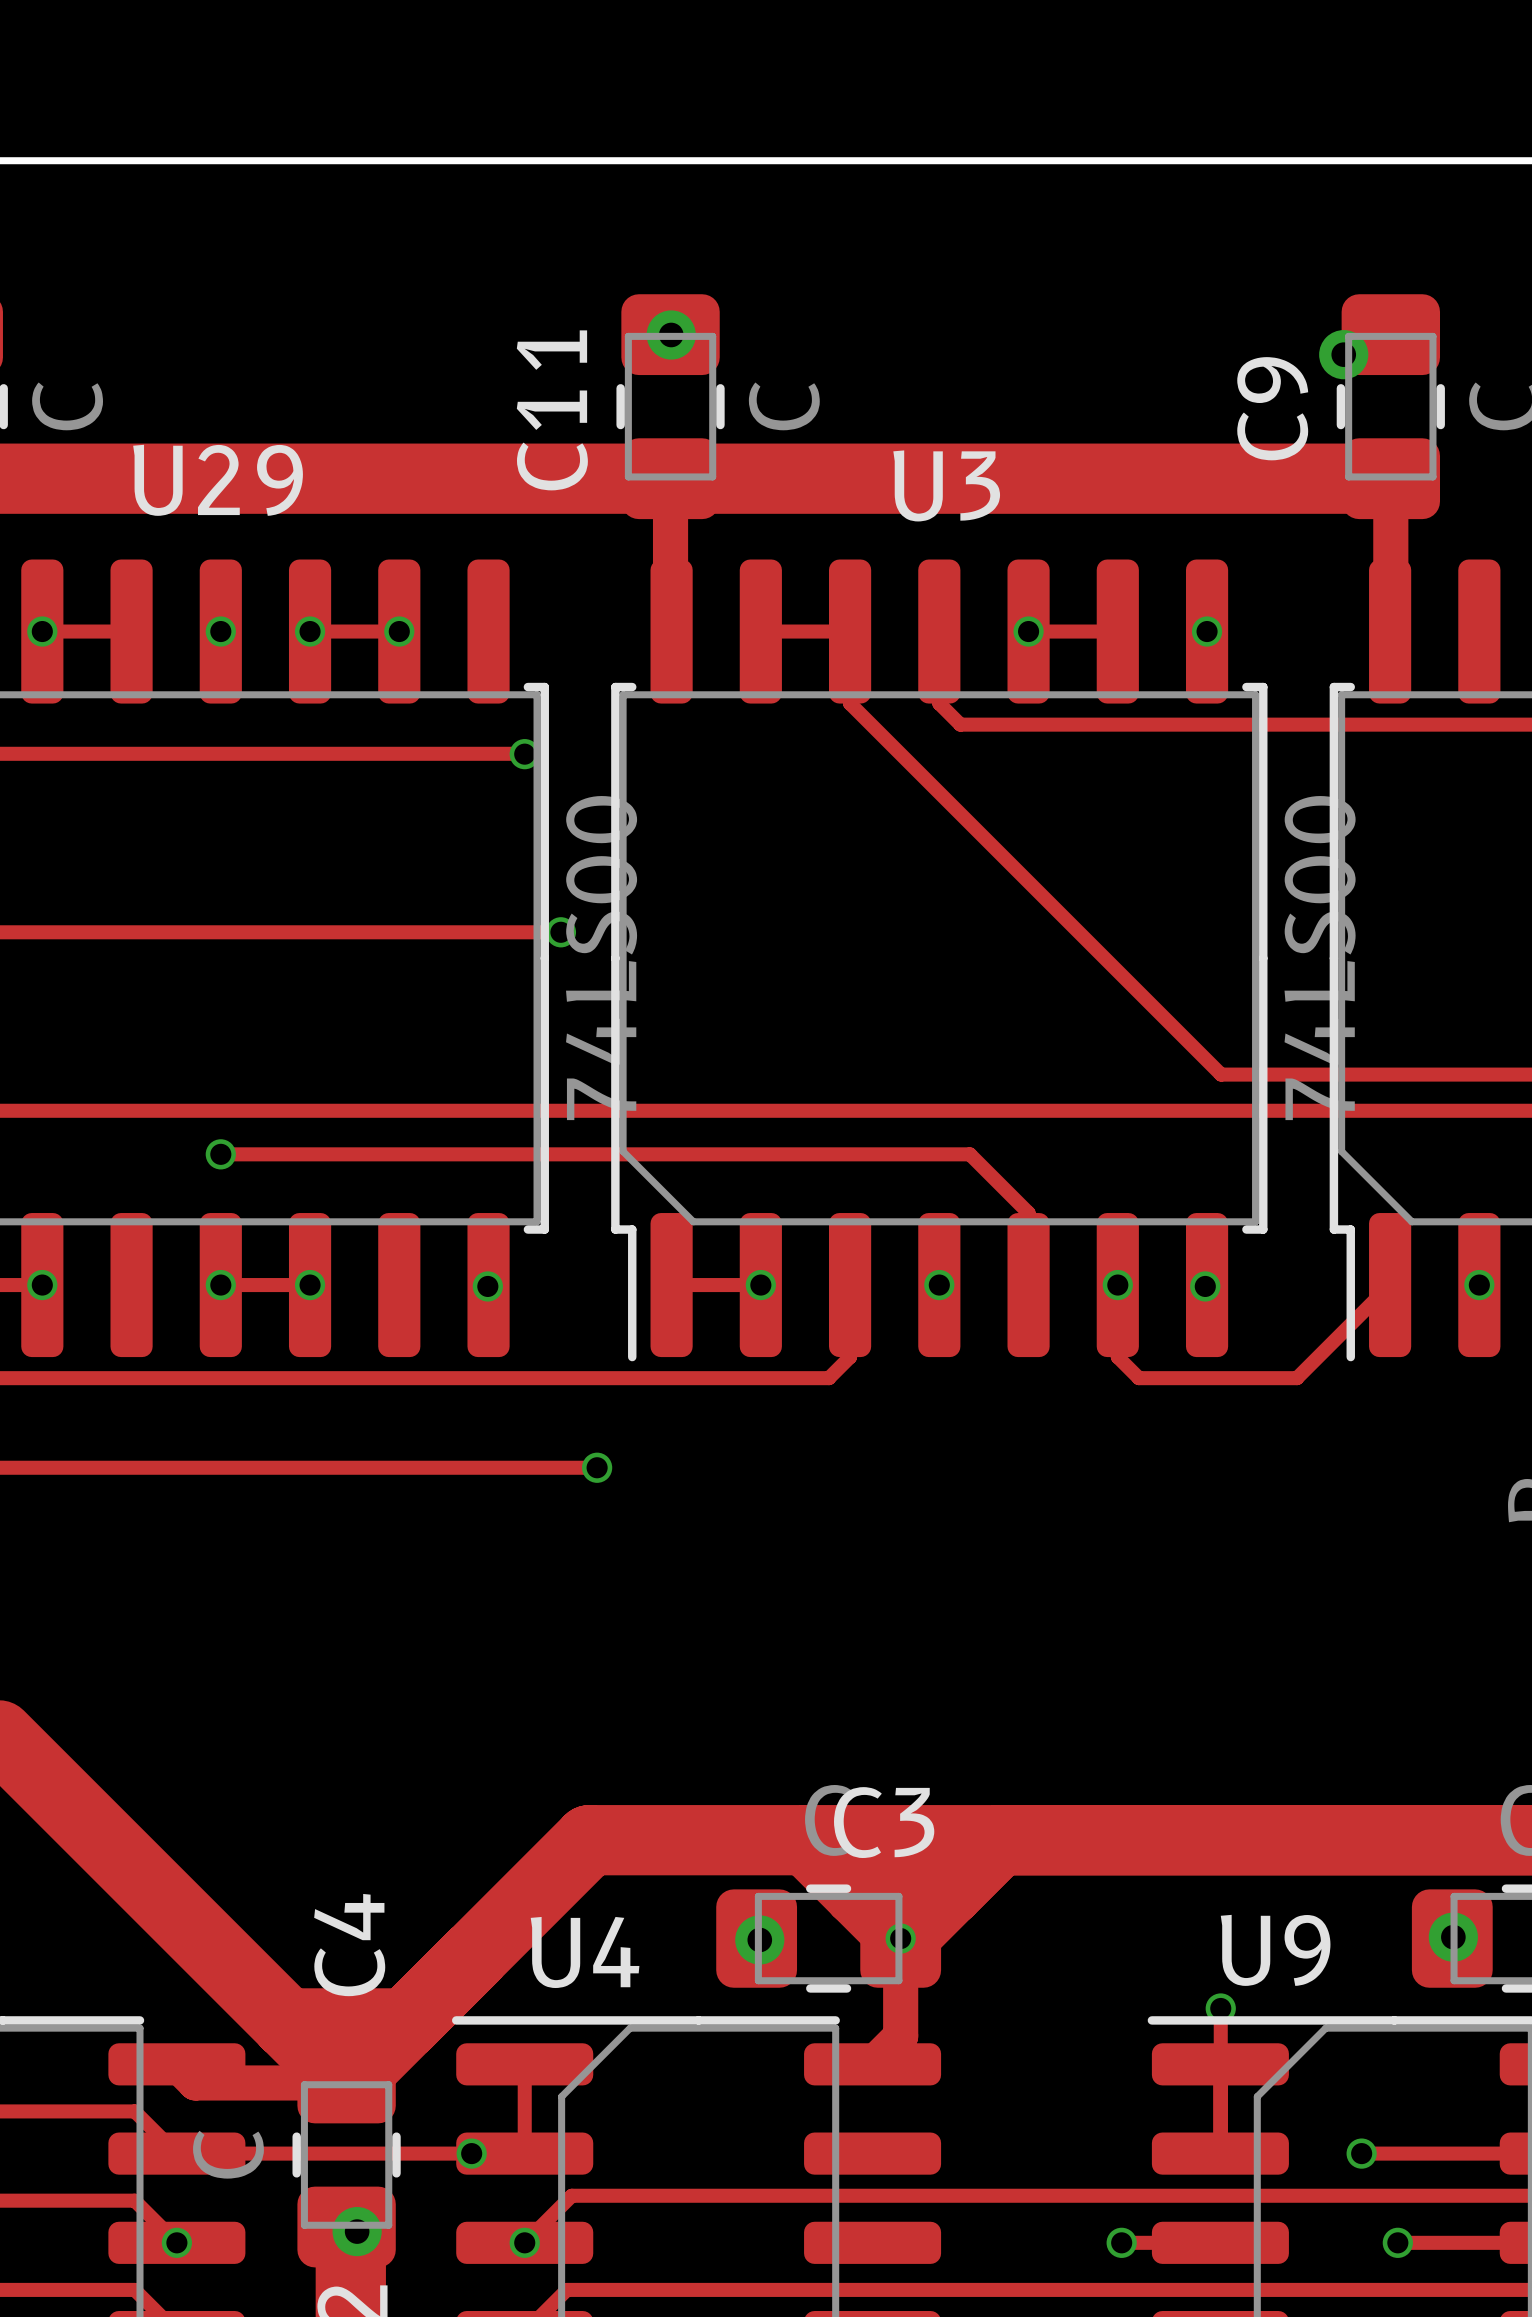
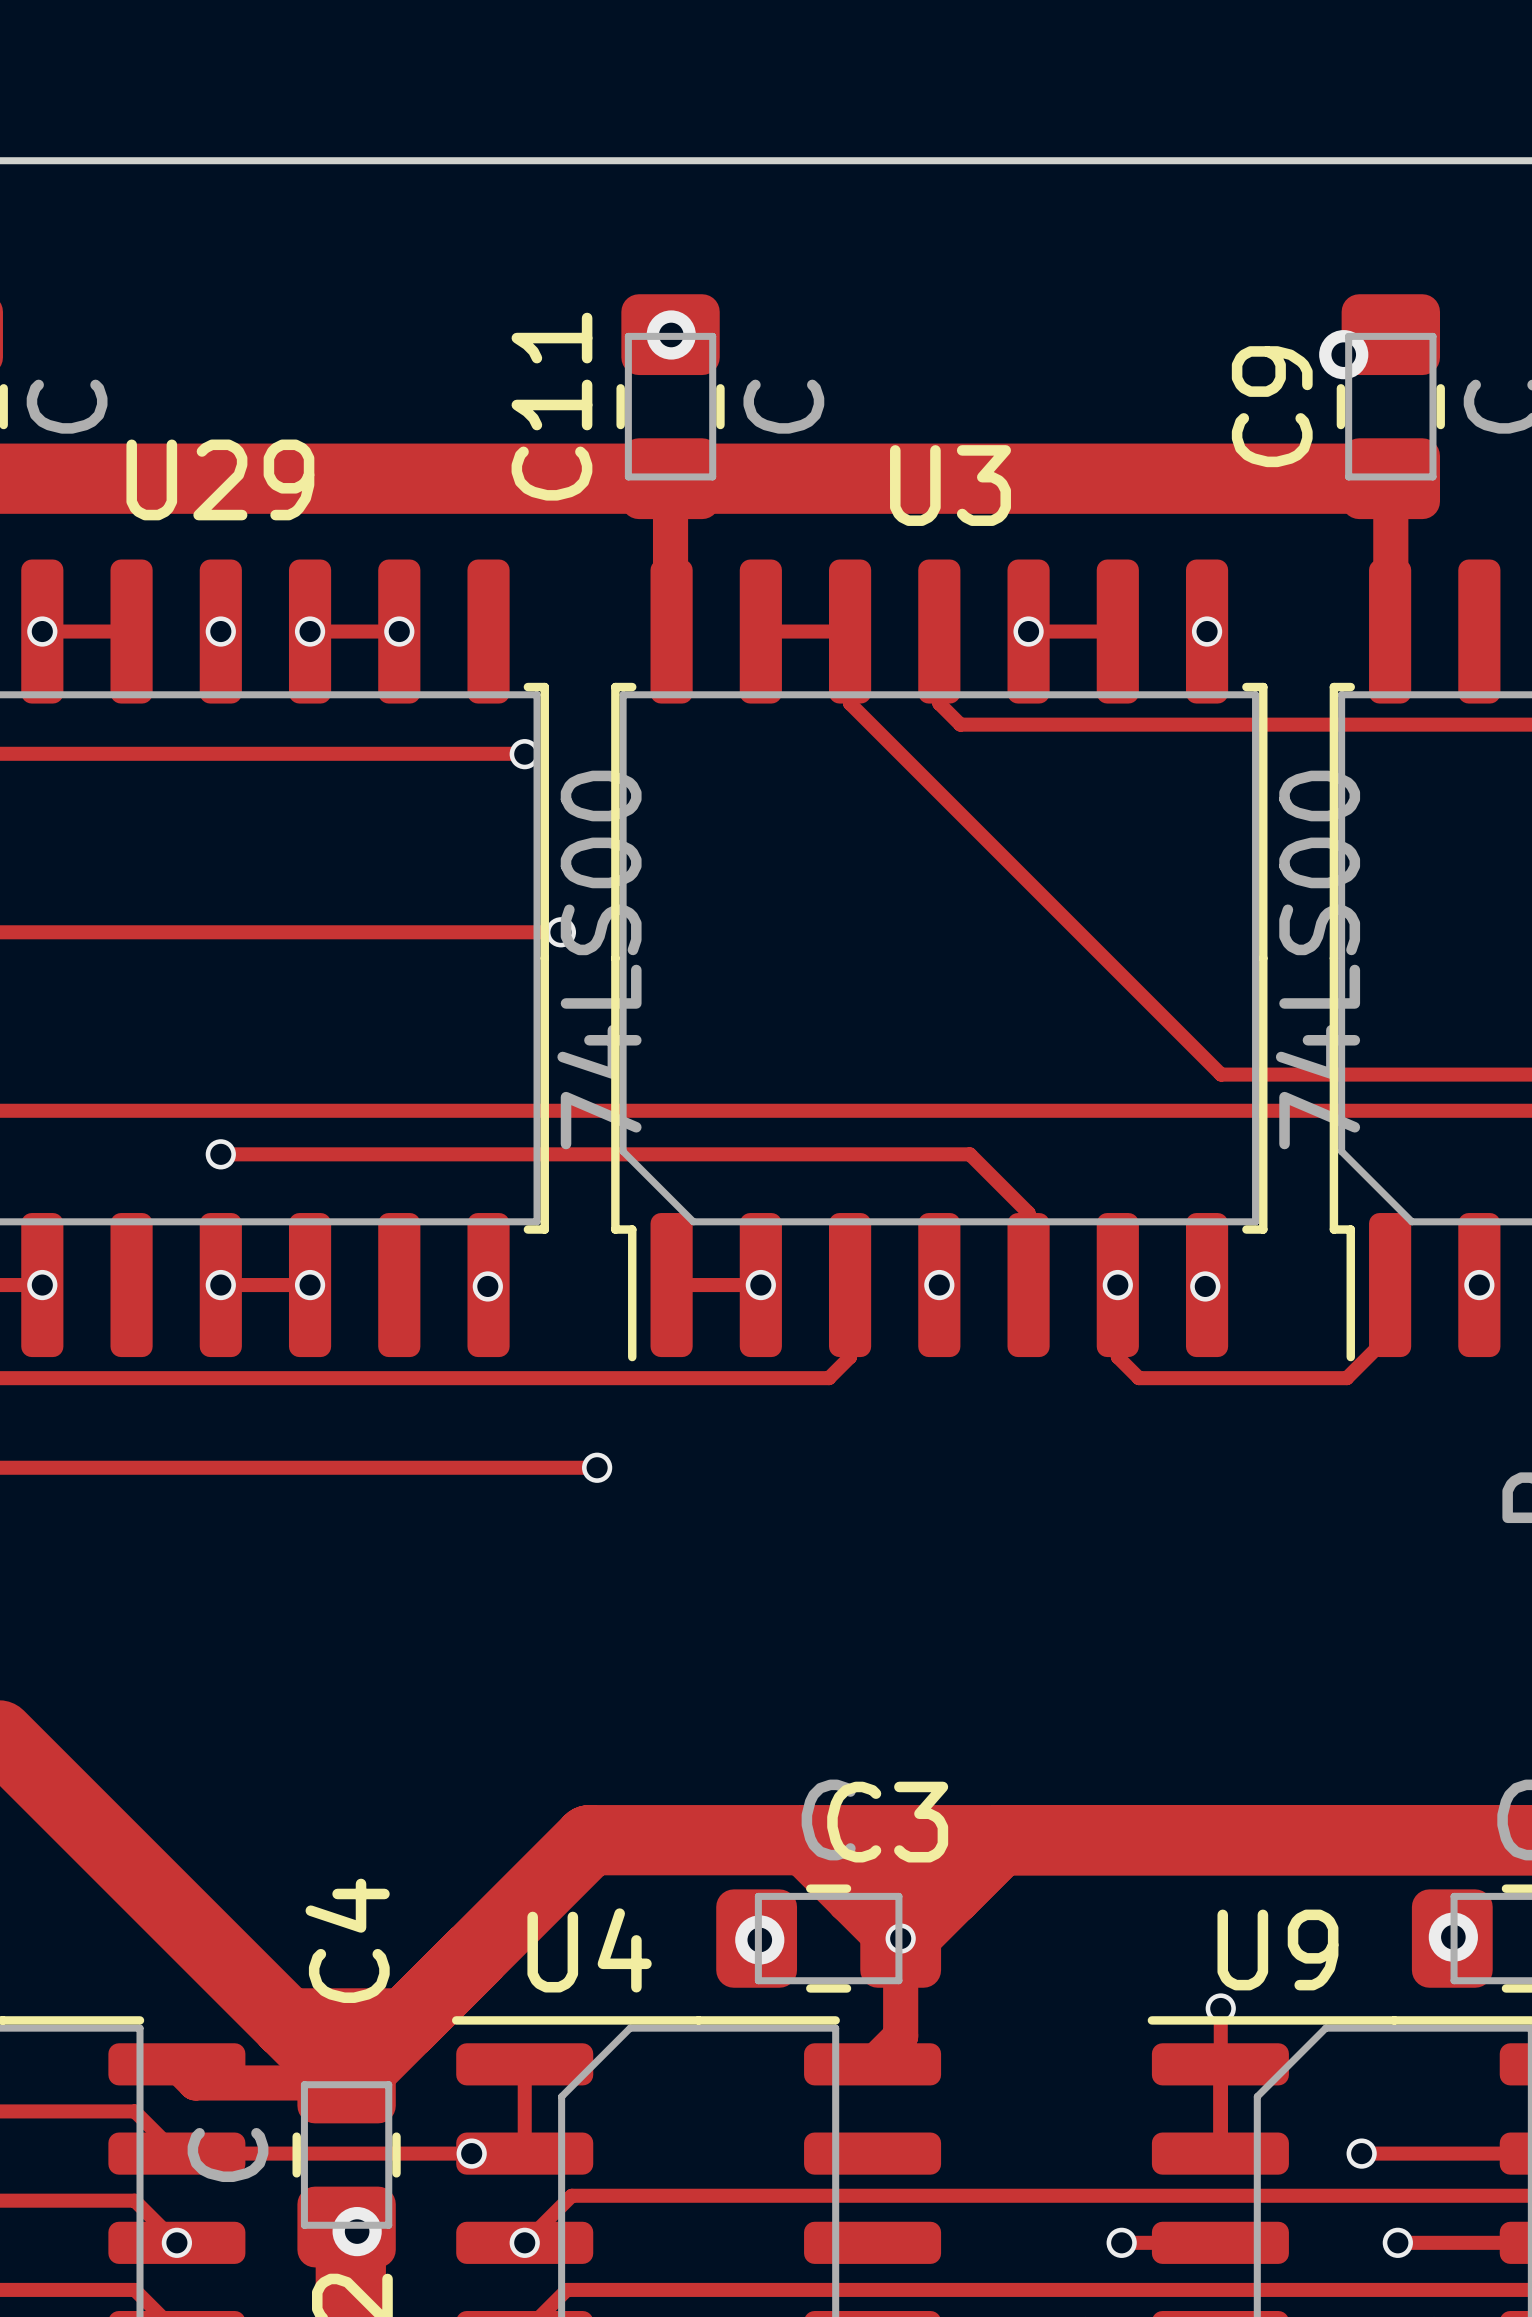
track: (1390, 1285) (1297, 1378) -> (1390, 1285) (1390, 1334) (1346, 1378) (1297, 1378)

